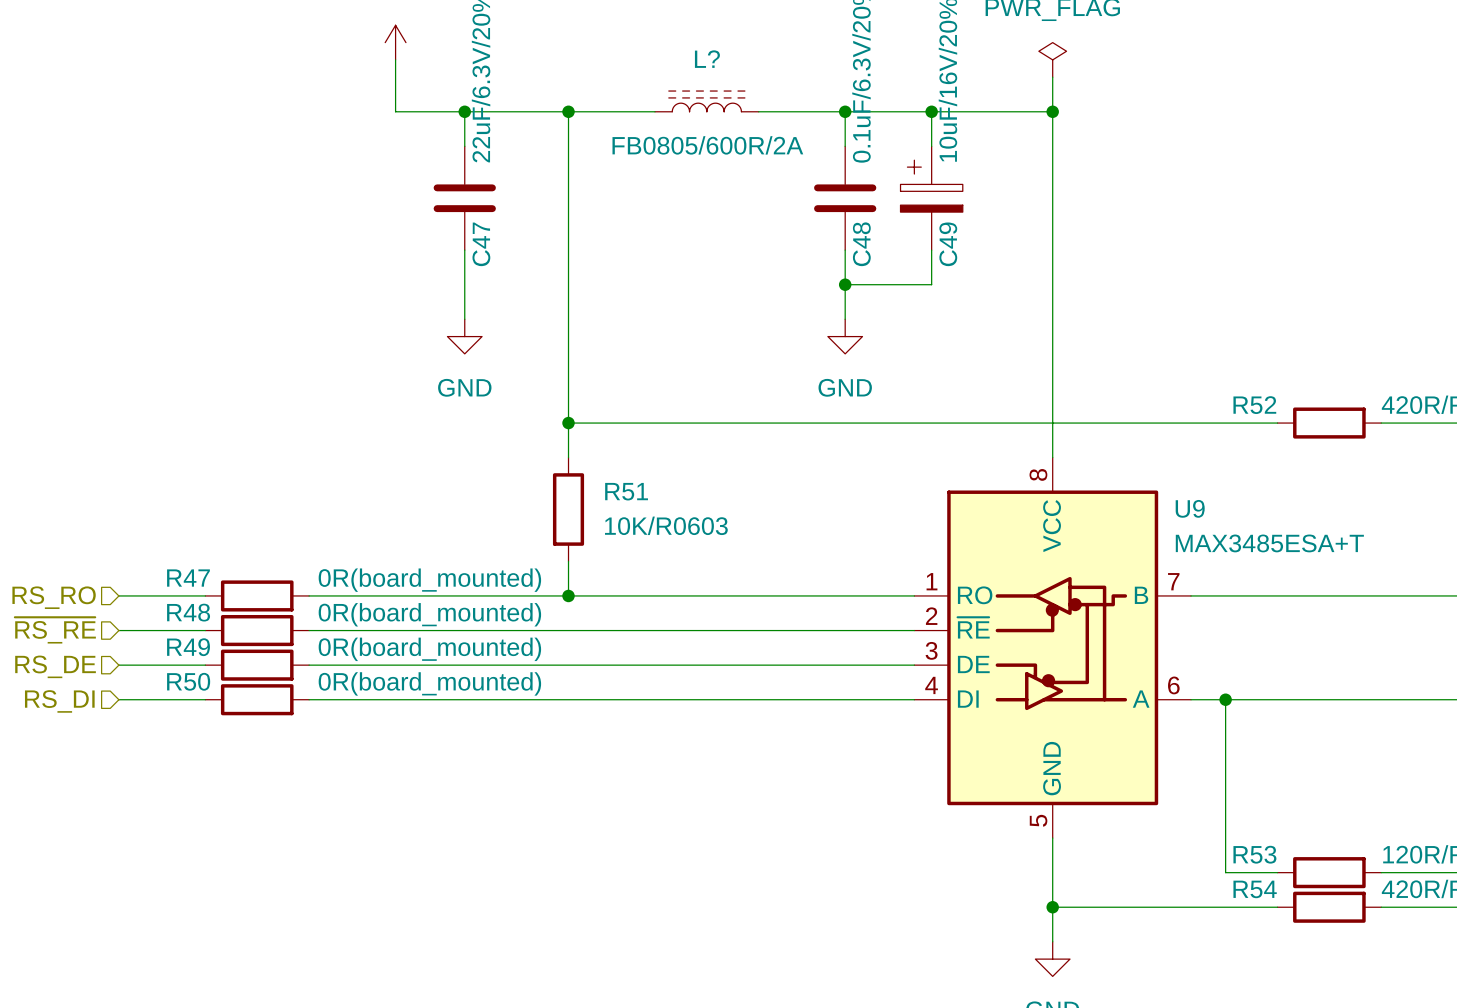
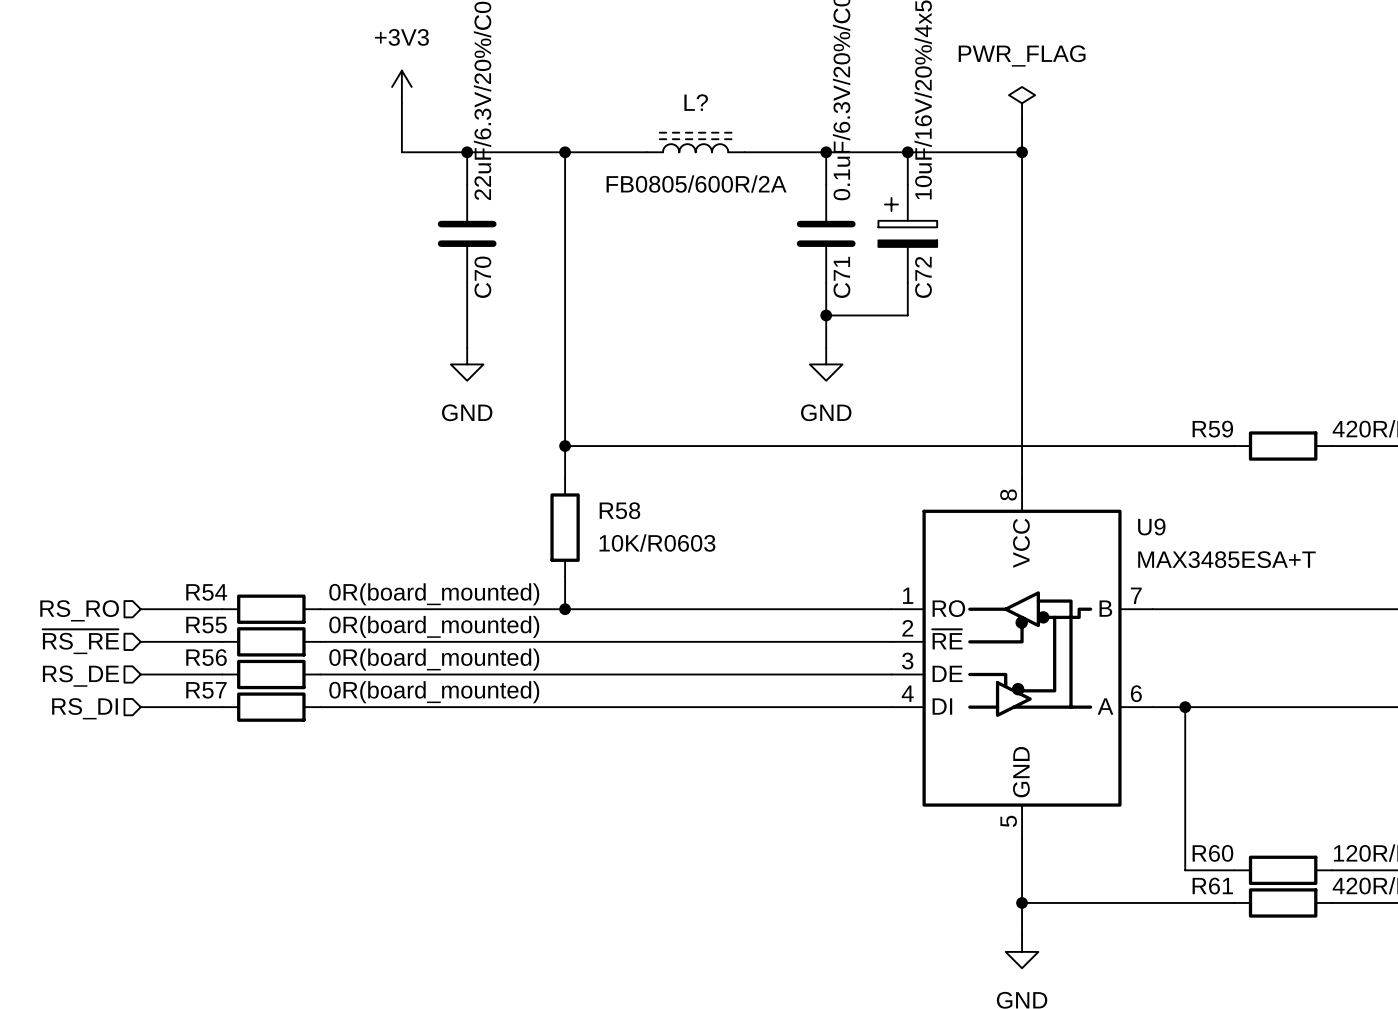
C47 name: C47 (481, 244) -> C70 (482, 277)
C48 name: C48 (861, 244) -> C71 (841, 277)
C49 name: C49 (948, 244) -> C72 (923, 277)
R52 name: R52 (1254, 405) -> R59 (1212, 429)
R51 name: R51 (626, 491) -> R58 (619, 510)
R47 name: R47 (188, 578) -> R54 (206, 592)
R48 name: R48 (188, 612) -> R55 (206, 625)
R49 name: R49 (188, 647) -> R56 (206, 657)
R50 name: R50 (188, 681) -> R57 (206, 690)
R53 name: R53 (1254, 854) -> R60 (1212, 853)
R54 name: R54 (1255, 889) -> R61 (1212, 886)

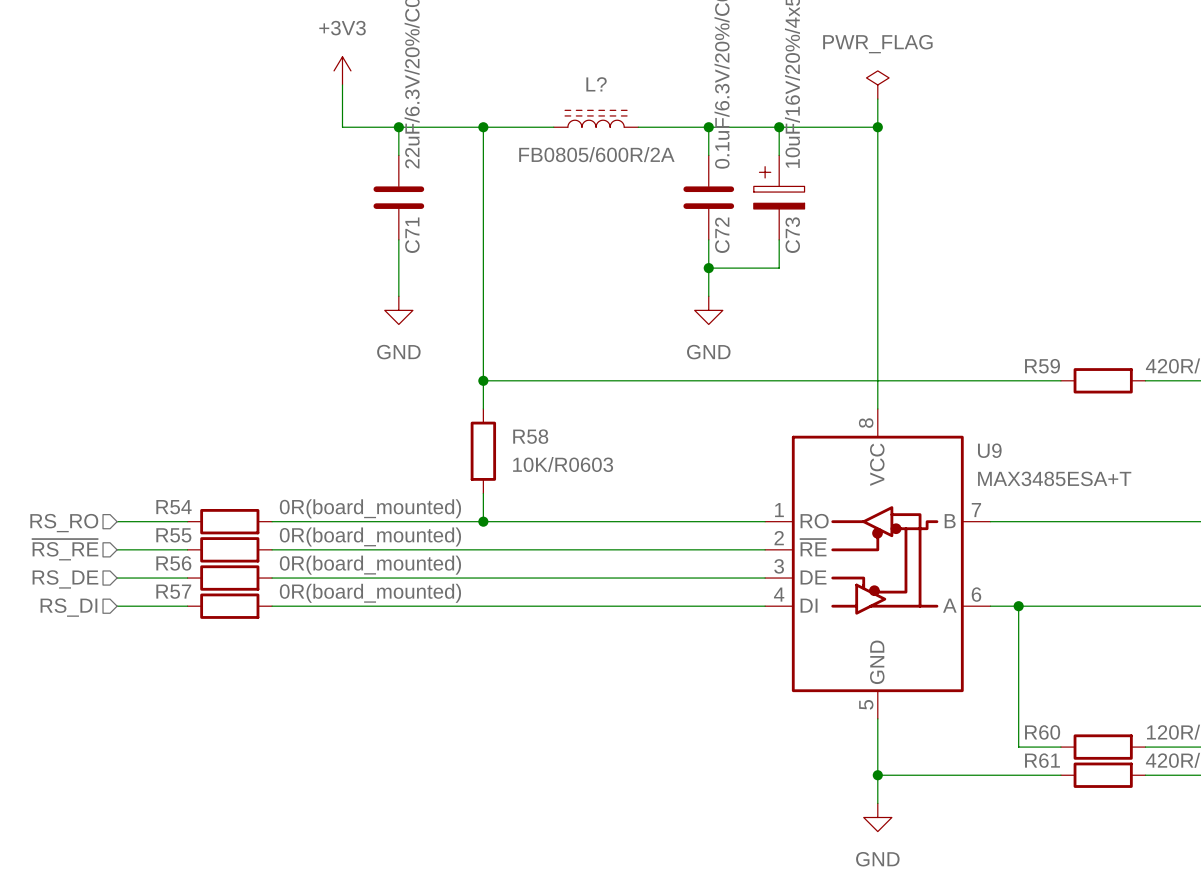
C70 name: C70 (482, 277) -> C71 (412, 235)
C71 name: C71 (841, 277) -> C72 (722, 235)
C72 name: C72 (923, 277) -> C73 (792, 235)

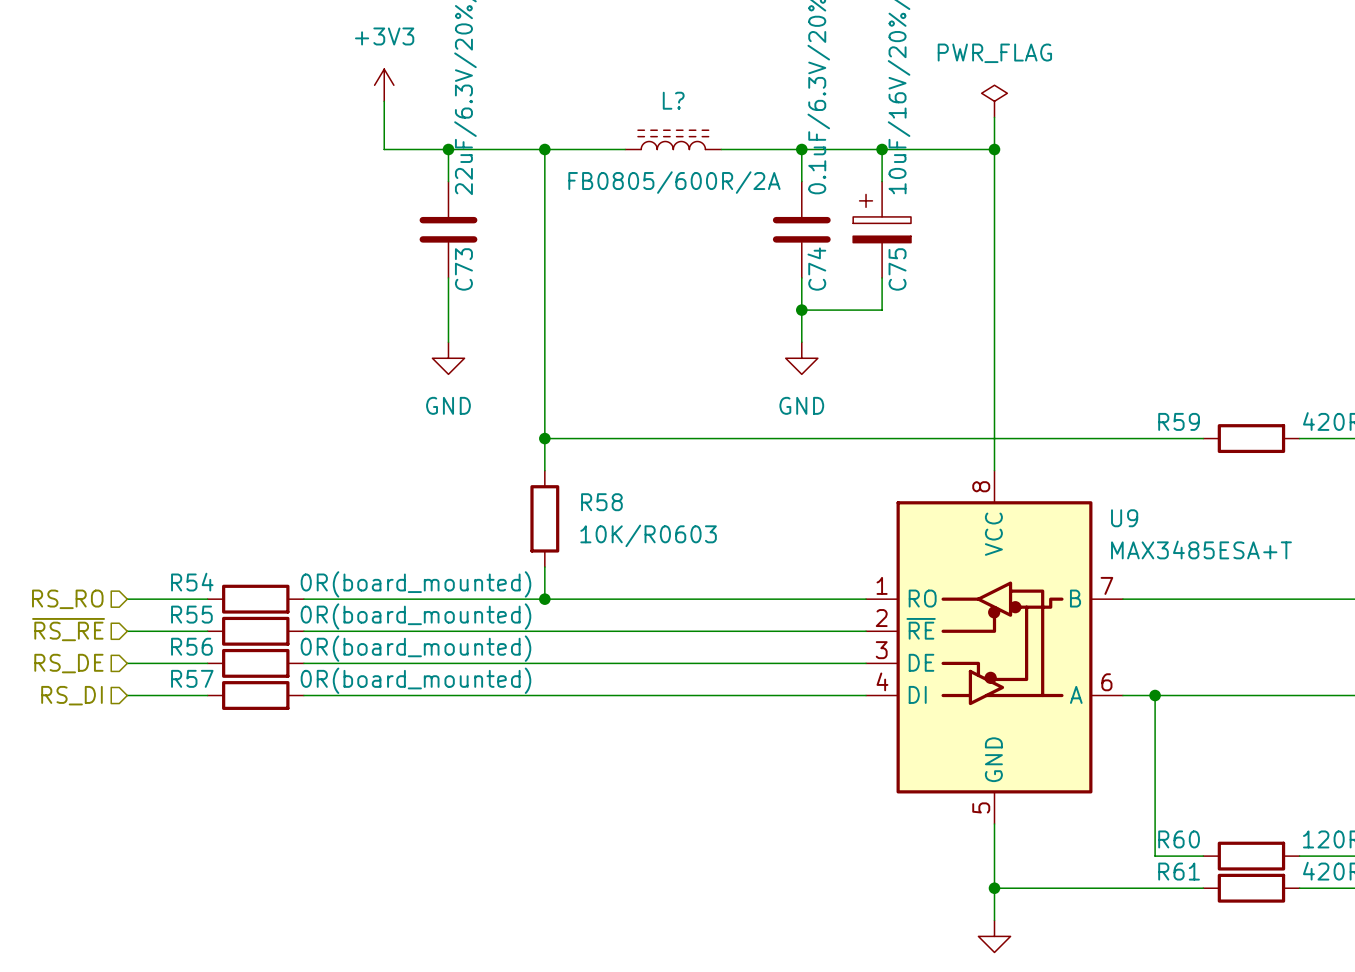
C71 name: C71 (412, 235) -> C73 (463, 269)
C72 name: C72 (722, 235) -> C74 (816, 269)
C73 name: C73 (792, 235) -> C75 (897, 269)

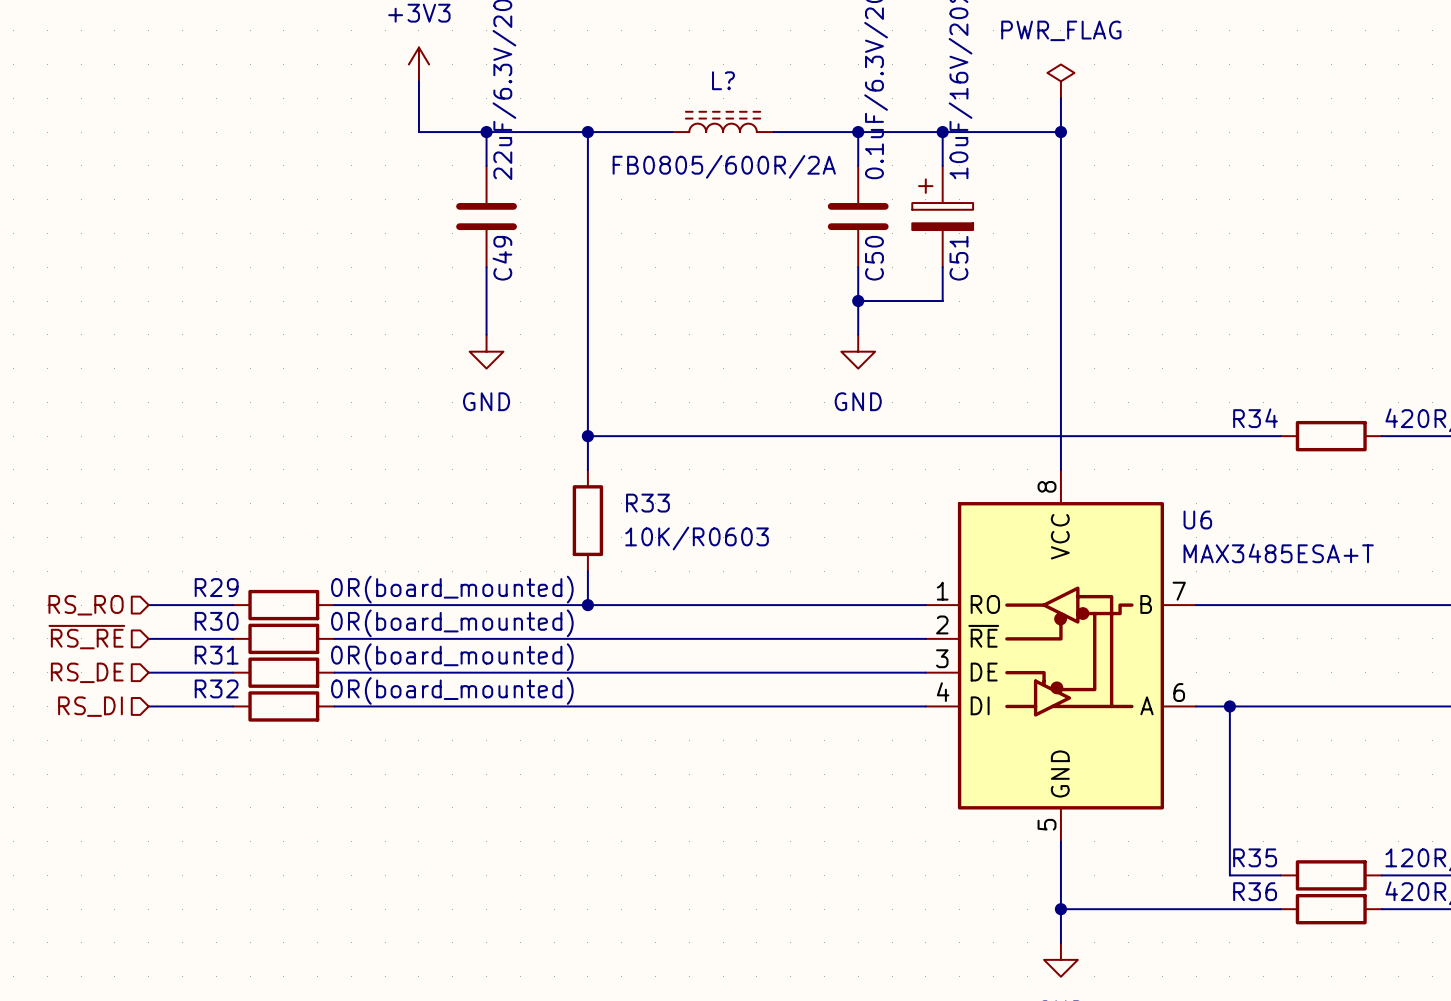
C73 name: C73 (463, 269) -> C49 (502, 258)
C74 name: C74 (816, 269) -> C50 (874, 258)
C75 name: C75 (897, 269) -> C51 (958, 258)
R59 name: R59 (1179, 421) -> R34 (1255, 418)
R58 name: R58 (601, 502) -> R33 (647, 503)
U9 name: U9 (1124, 518) -> U6 (1197, 519)
R54 name: R54 (192, 582) -> R29 (216, 587)
R55 name: R55 (191, 614) -> R30 (216, 621)
R56 name: R56 (191, 646) -> R31 (216, 655)
R57 name: R57 (192, 678) -> R32 (216, 688)
R60 name: R60 (1179, 839) -> R35 (1255, 857)
R61 name: R61 (1179, 871) -> R36 (1255, 891)

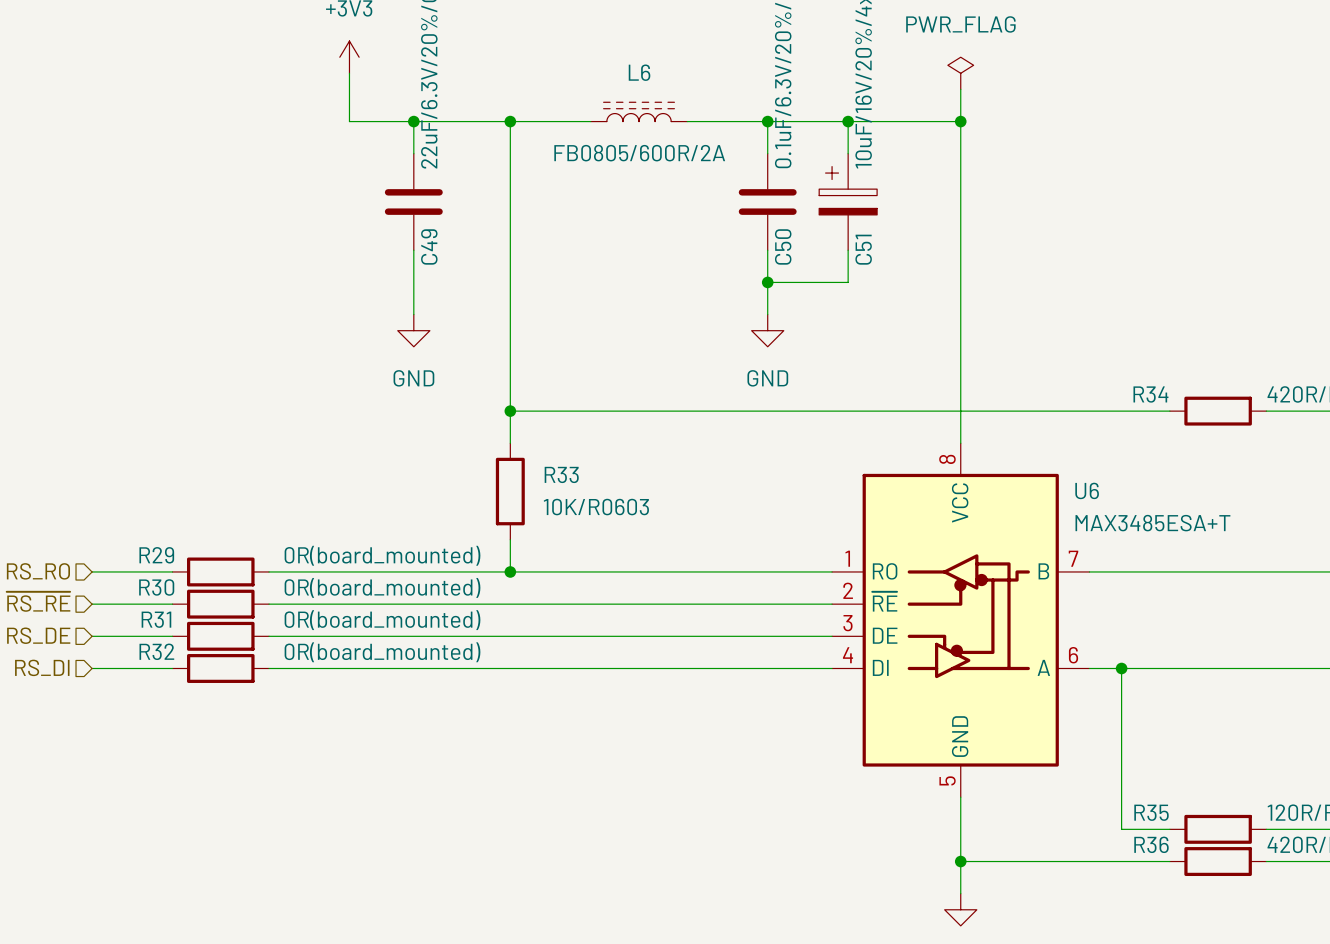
L? name: L? (723, 80) -> L6 (639, 72)

